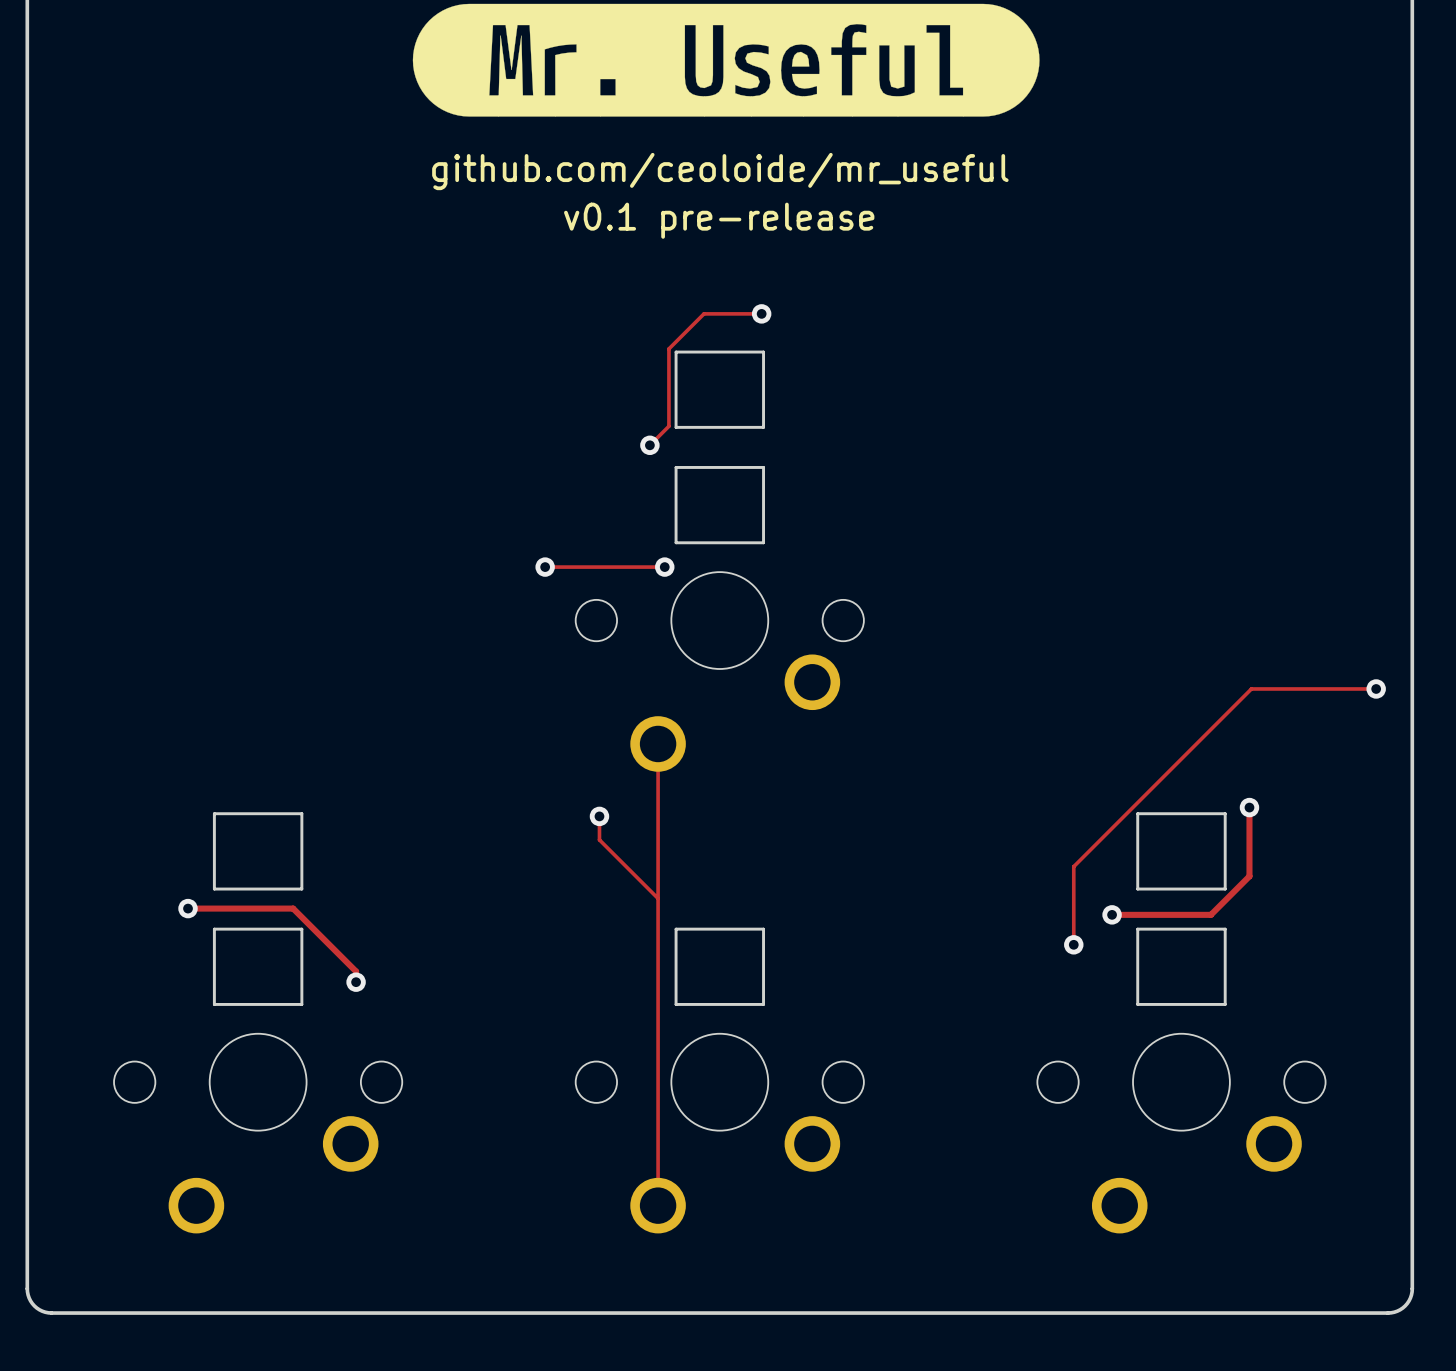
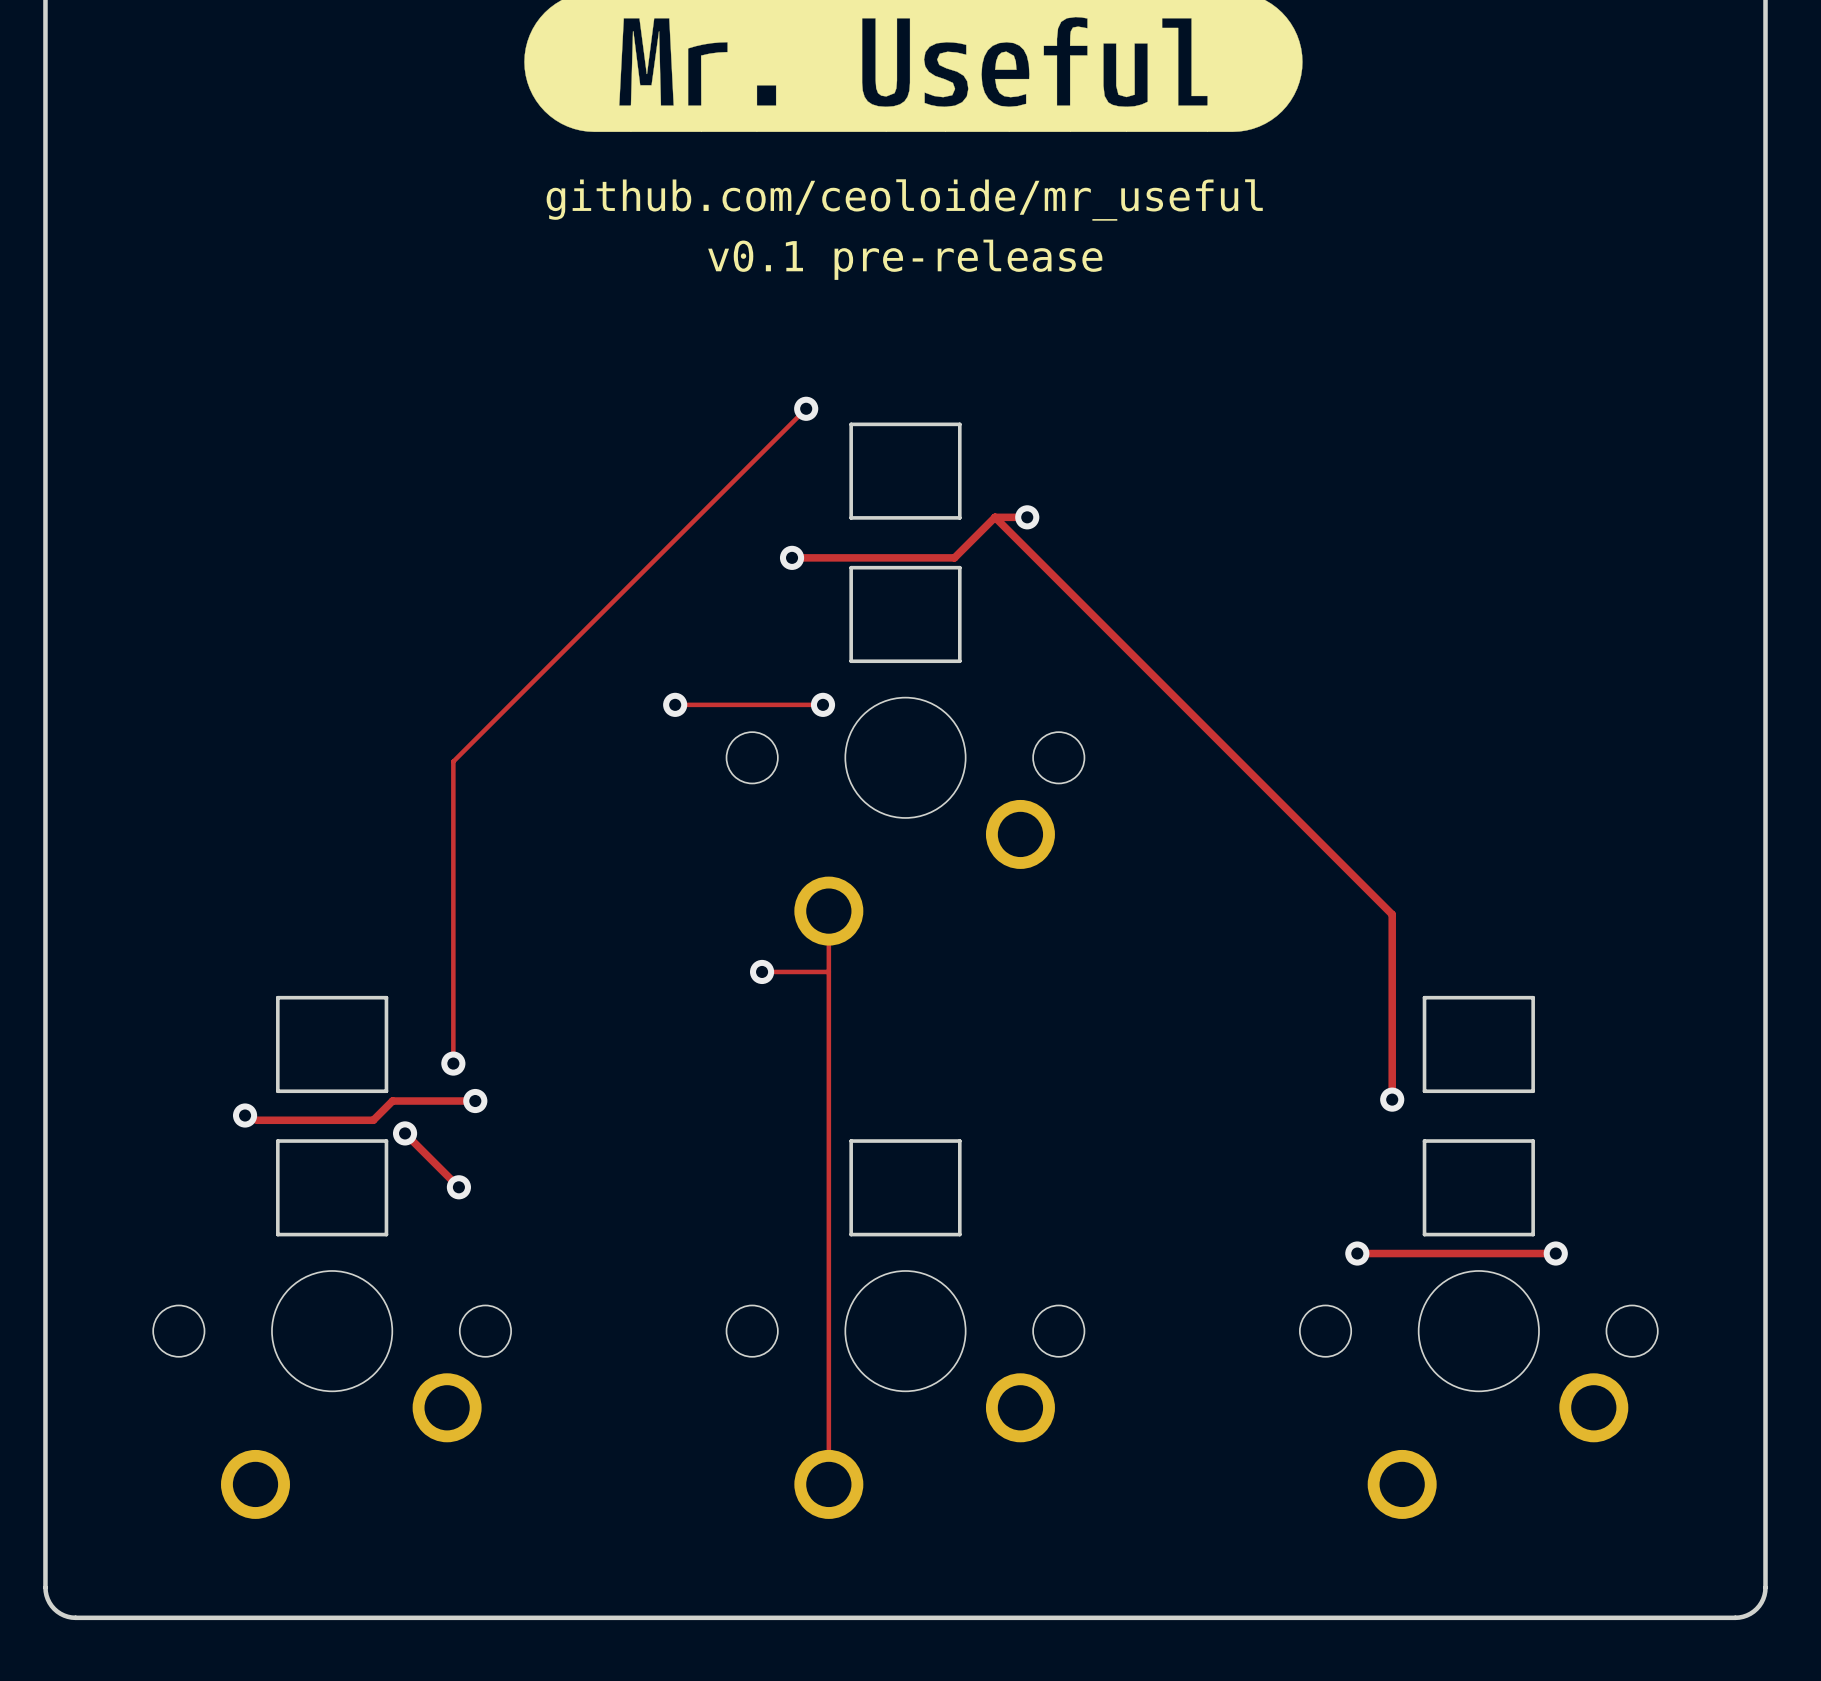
track: (761, 313) (703, 313) (668, 348) (668, 426) (649, 445) -> none
via: (761, 313) -> none
track: none -> (806, 408) (453, 761) (453, 1063)
via: none -> (806, 408)
track: none -> (995, 517) (1027, 517)
track: none -> (995, 517) (1392, 914) (1392, 1099)
track: none -> (995, 517) (954, 557) (792, 557)
via: none -> (1027, 517)
via position: (649, 445) -> (792, 557)
track: (545, 567) (664, 567) -> none
via position: (545, 567) -> (675, 704)
via position: (664, 567) -> (823, 704)
track: none -> (675, 704) (823, 704)
track: (1376, 688) (1251, 688) (1073, 866) (1073, 944) -> none
via: (1376, 688) -> none
track: none -> (762, 971) (828, 971)
track: (1249, 807) (1249, 876) (1210, 914) (1112, 914) -> none
via: (1249, 807) -> none
track: (599, 816) (599, 839) (658, 898) -> none
via position: (599, 816) -> (762, 971)
via: none -> (453, 1063)
track: none -> (475, 1101) (392, 1101) (373, 1120) (256, 1120)
via: none -> (475, 1101)
track: (188, 908) (293, 908) (356, 971) (356, 982) -> none
via position: (1112, 914) -> (1392, 1099)
track: none -> (405, 1133) (458, 1187)
via: none -> (405, 1133)
via: (1073, 944) -> none
via position: (356, 982) -> (458, 1187)
track: none -> (1357, 1253) (1555, 1253)
via: none -> (1357, 1253)
via: none -> (1555, 1253)

